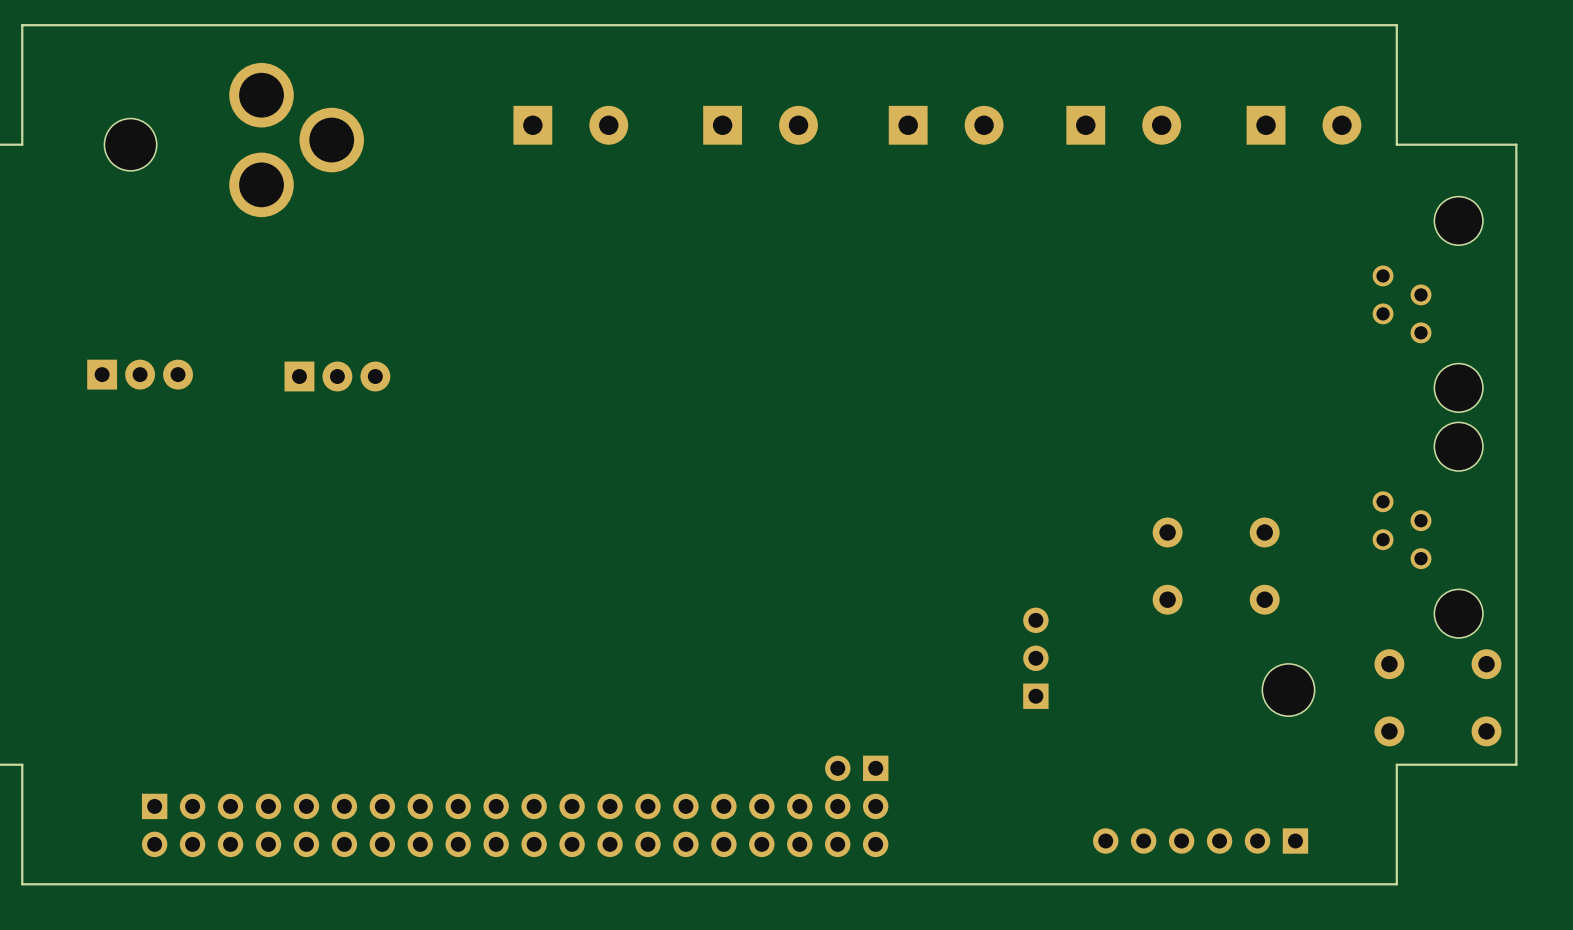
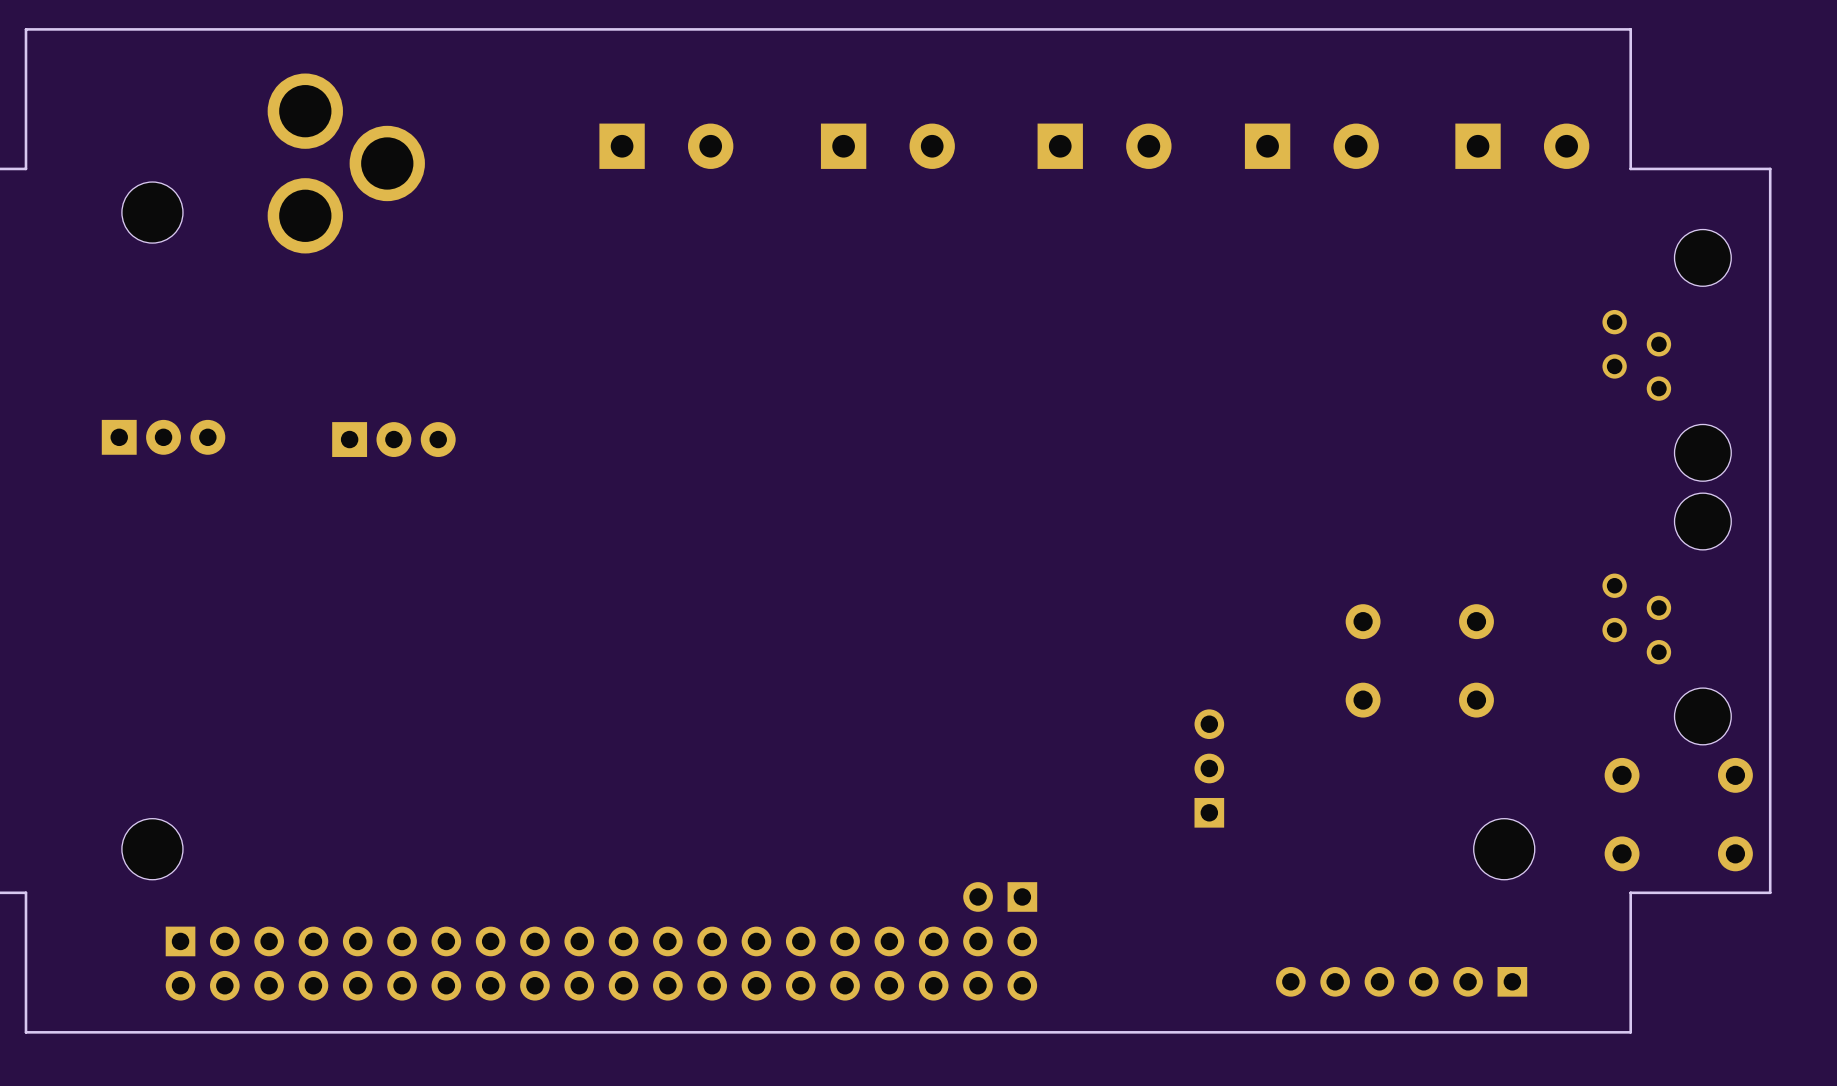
part position: (130, 144) -> (152, 212)
part position: (1288, 690) -> (1504, 849)
part: none -> (152, 849)

